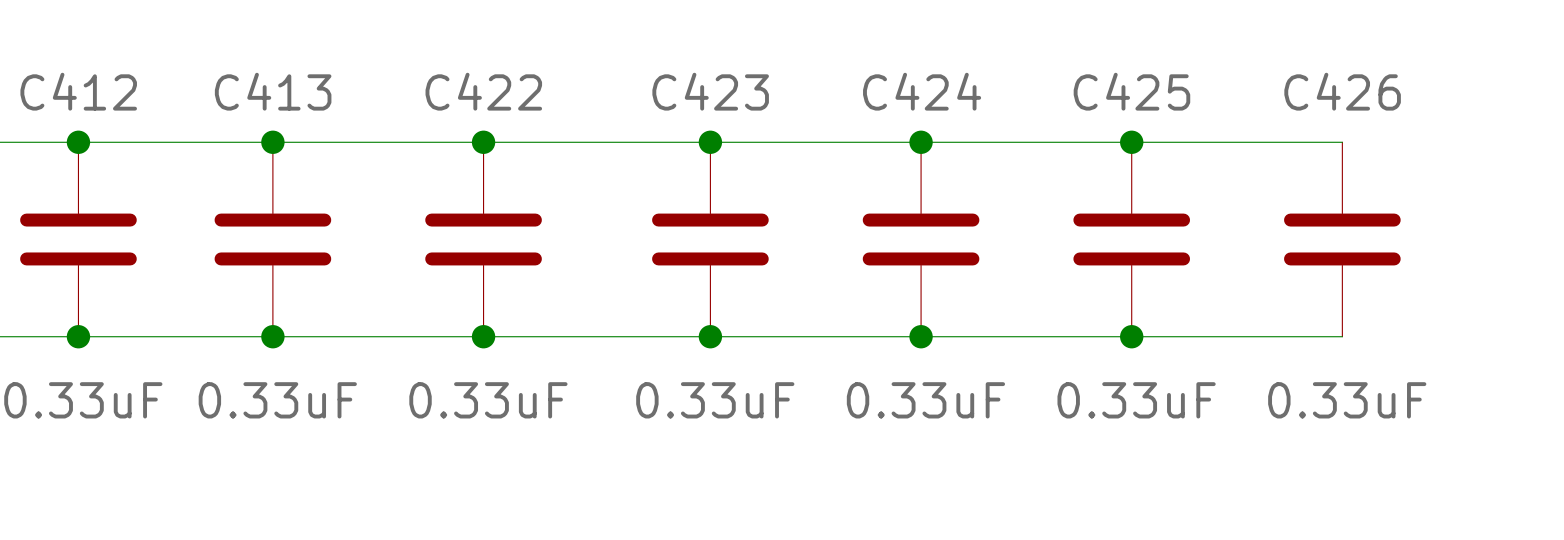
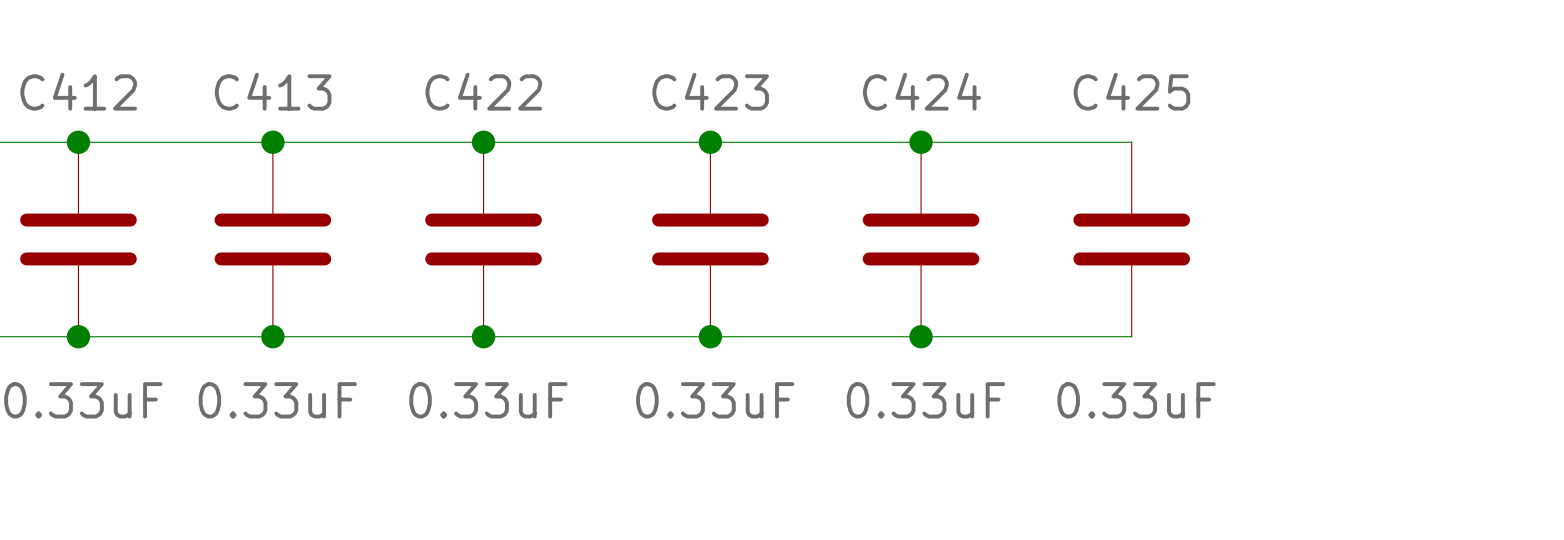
wire: (1131, 142) (1342, 142) -> none
junction: (1131, 142) -> none
C426: 0.33uF (1342, 239) -> none
wire: (1131, 336) (1342, 336) -> none
junction: (1131, 336) -> none

